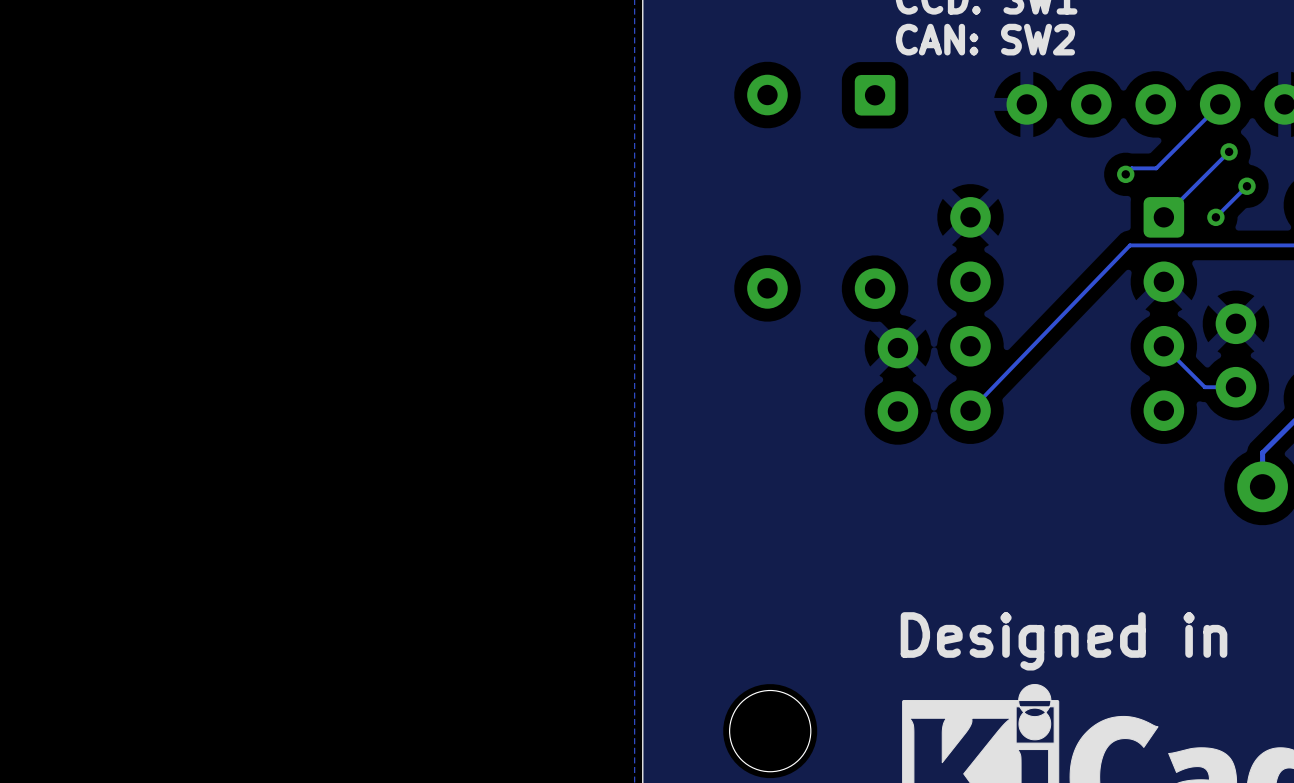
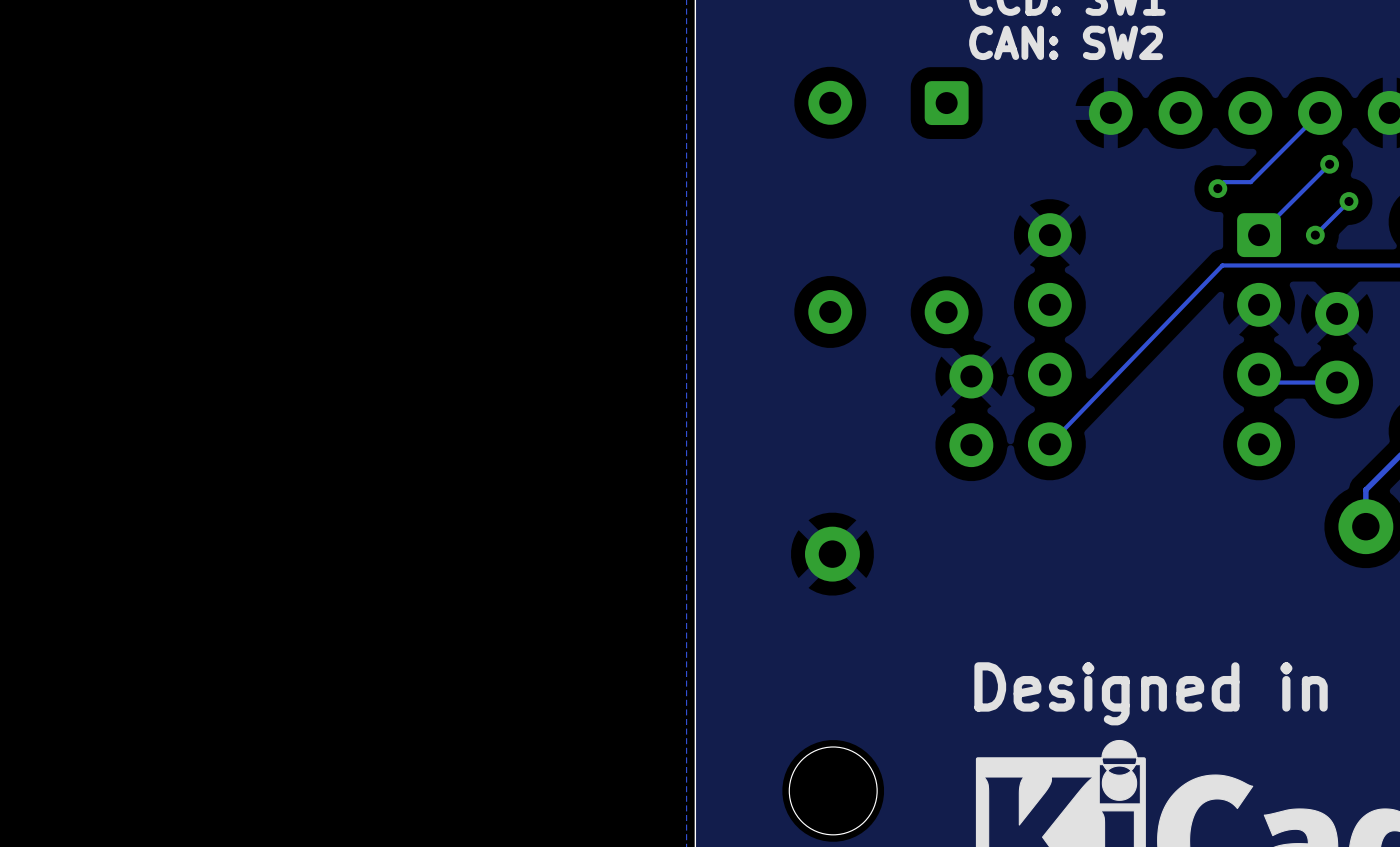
track: (1163, 346) (1204, 387) (1235, 387) -> none
track: none -> (1337, 382) (1267, 382)
part position: (1235, 355) -> (1337, 348)
part: none -> (832, 554)

